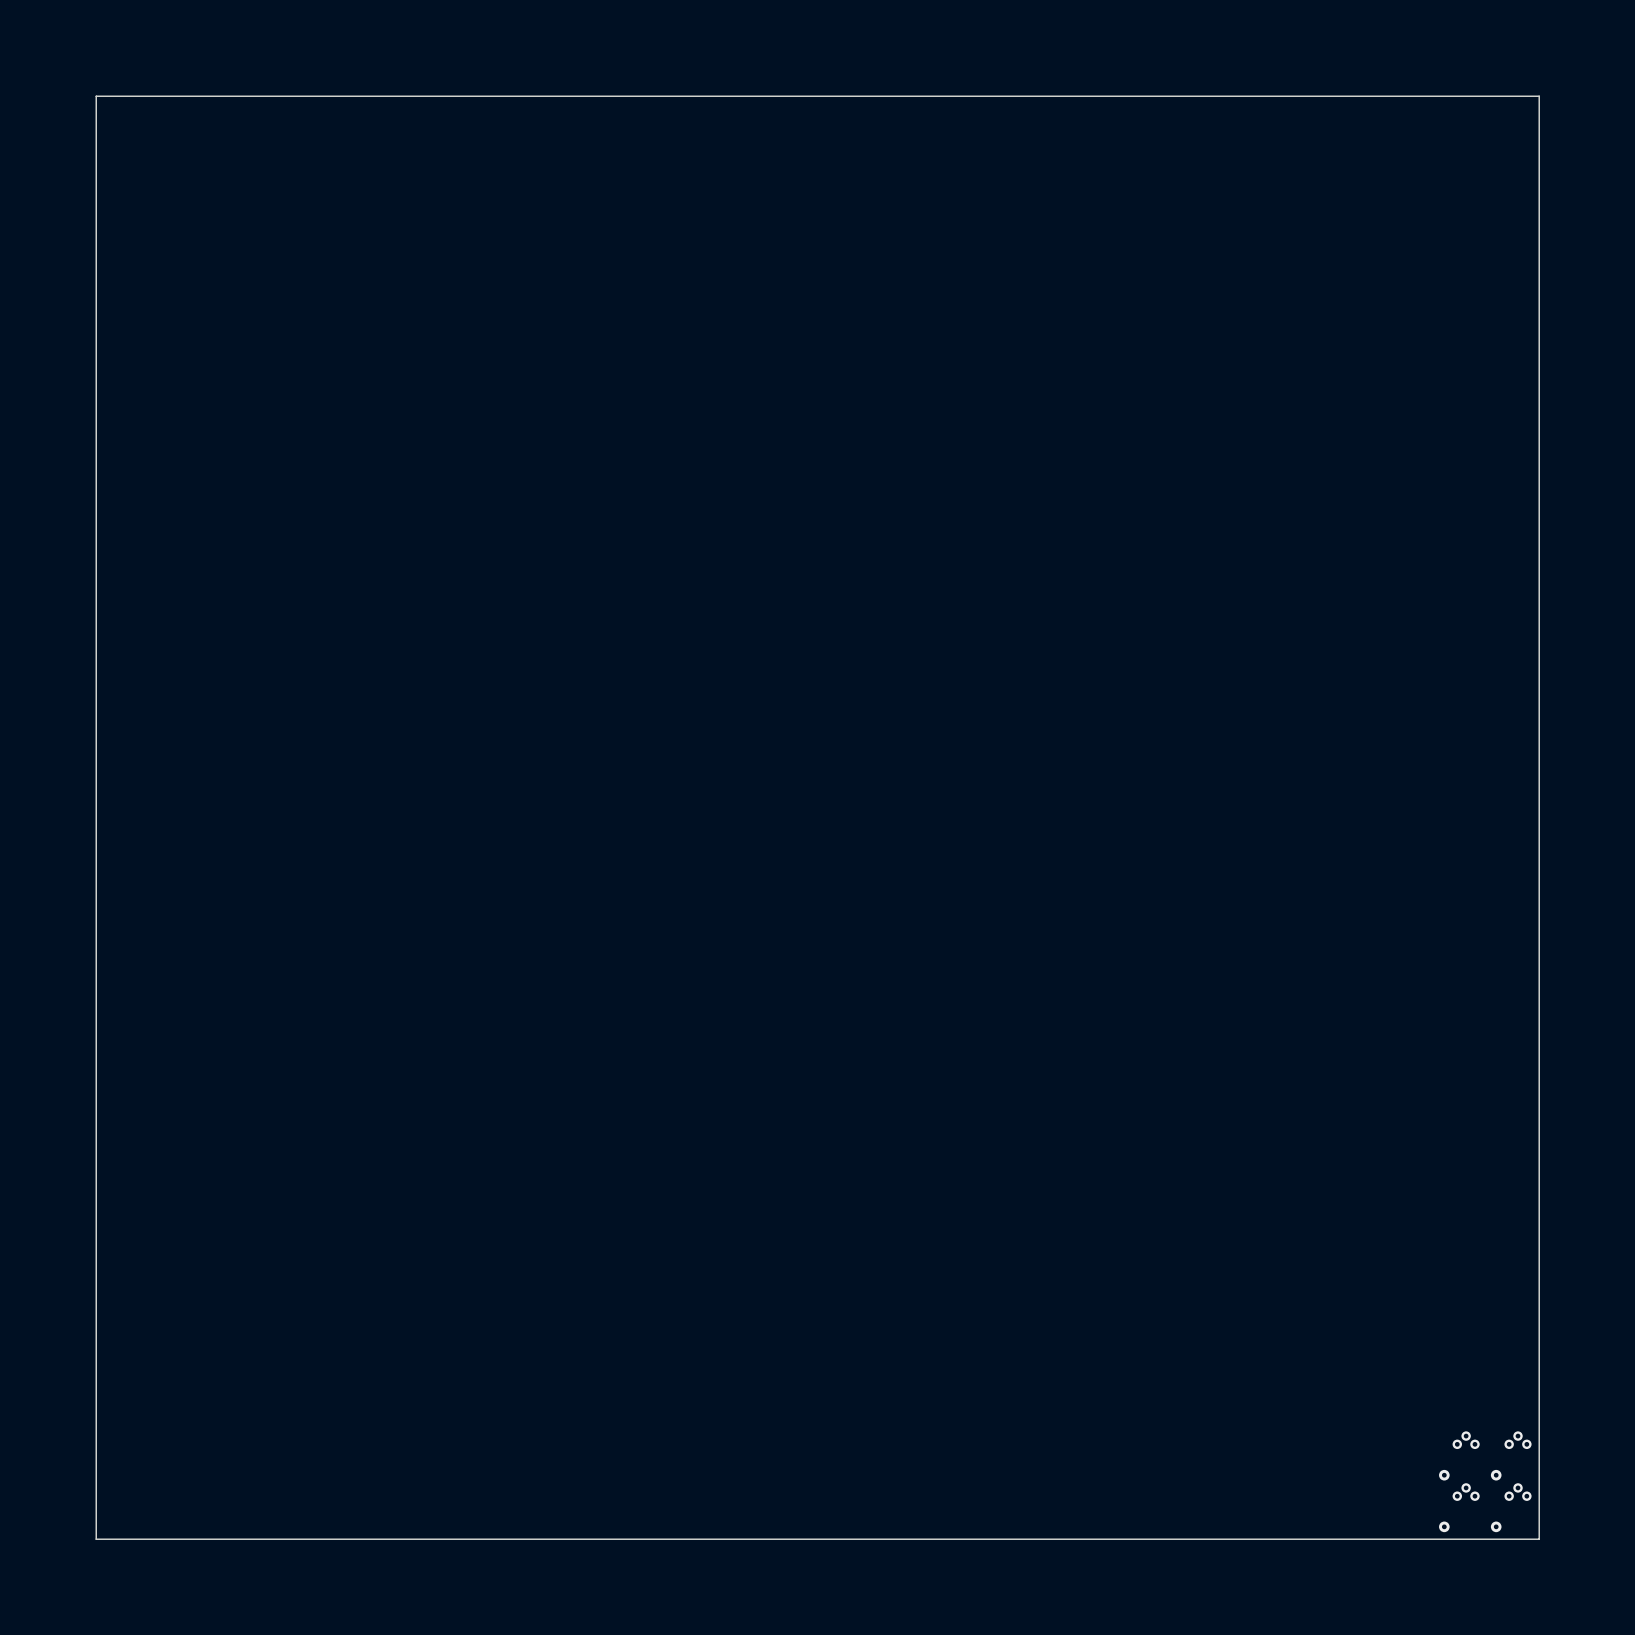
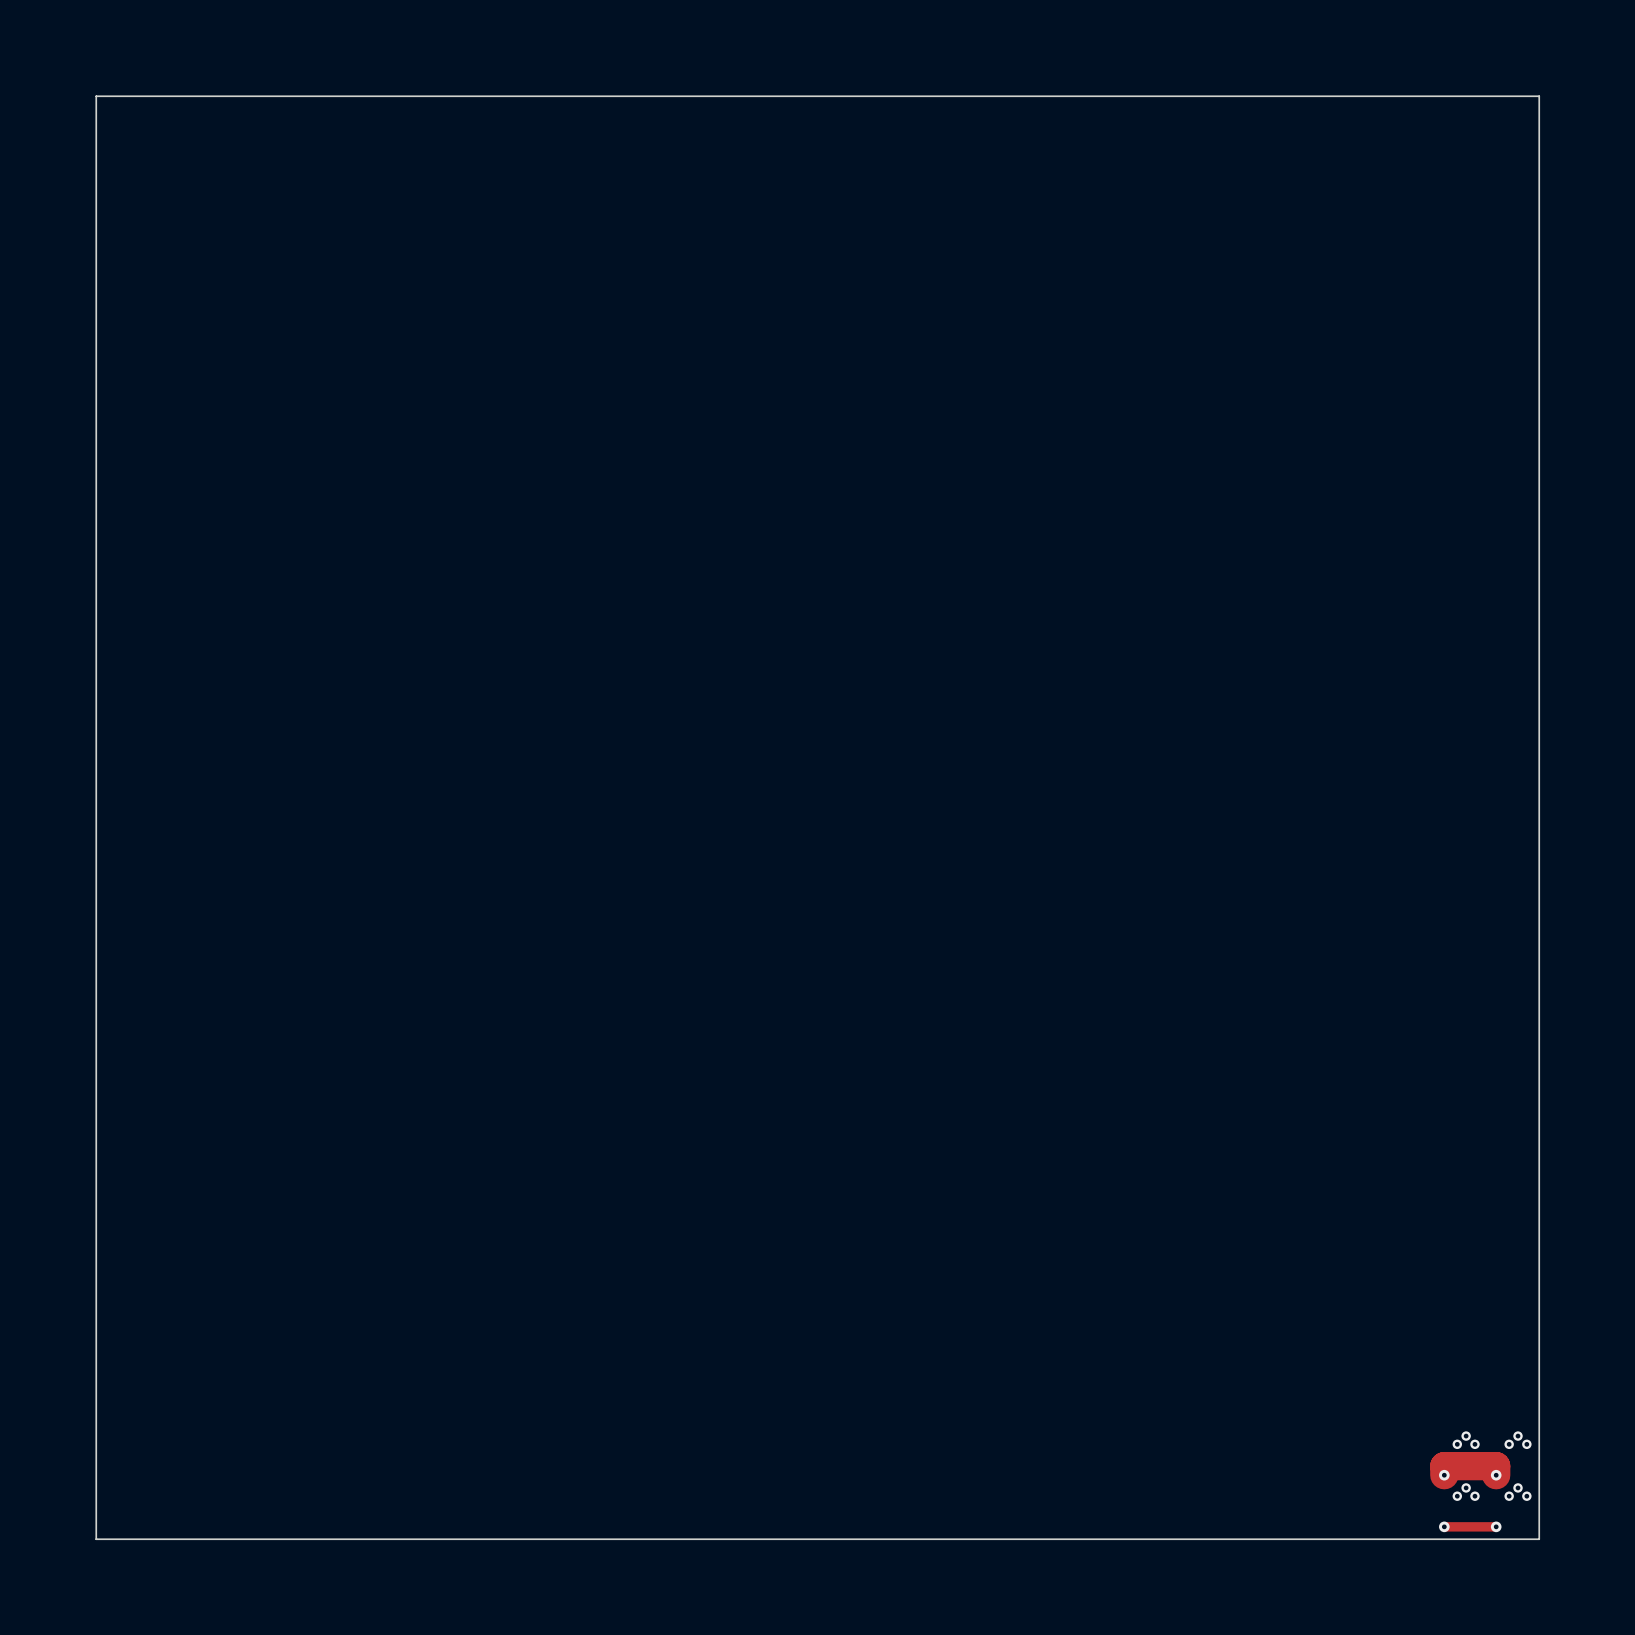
track: none -> (1444, 1475) (1444, 1466) (1496, 1466) (1496, 1475)
track: none -> (1444, 1526) (1496, 1526)

